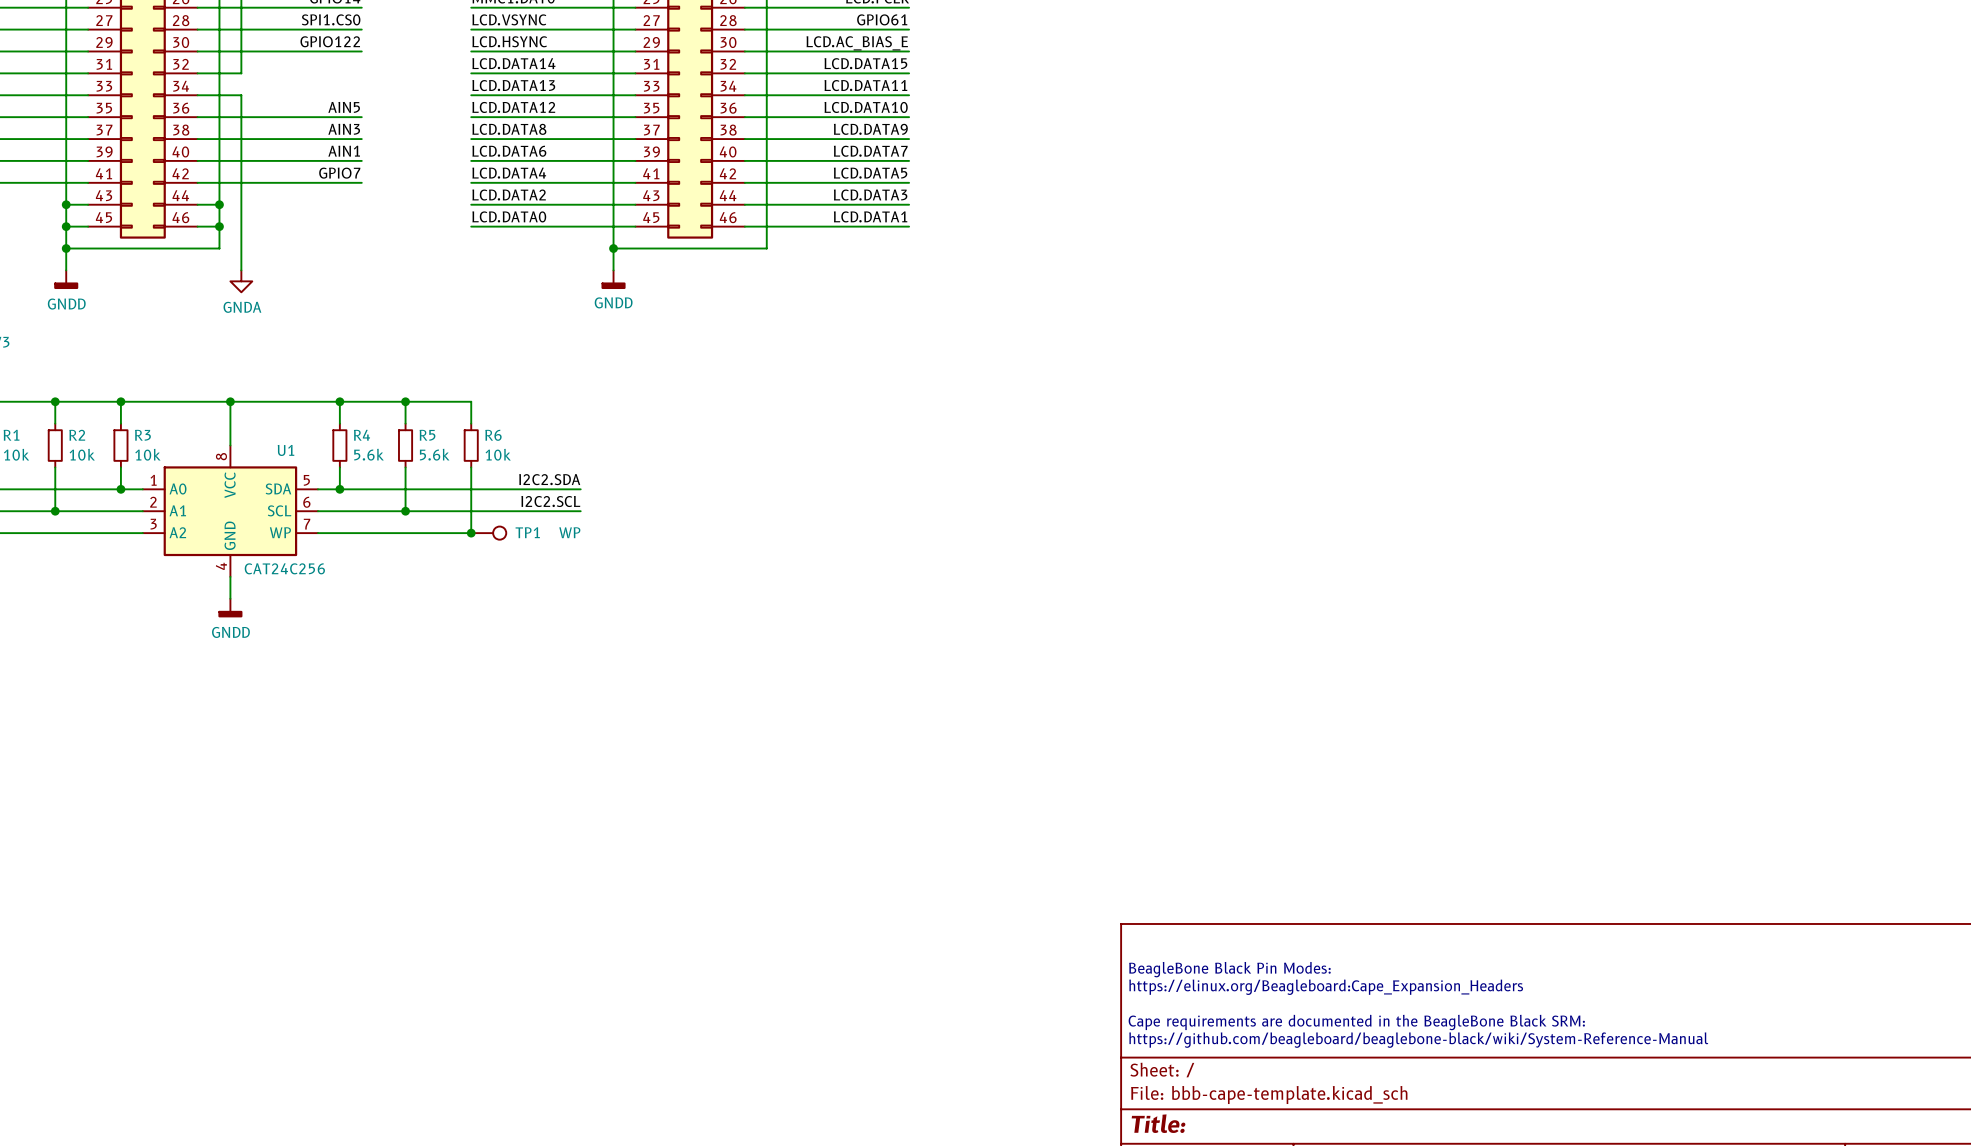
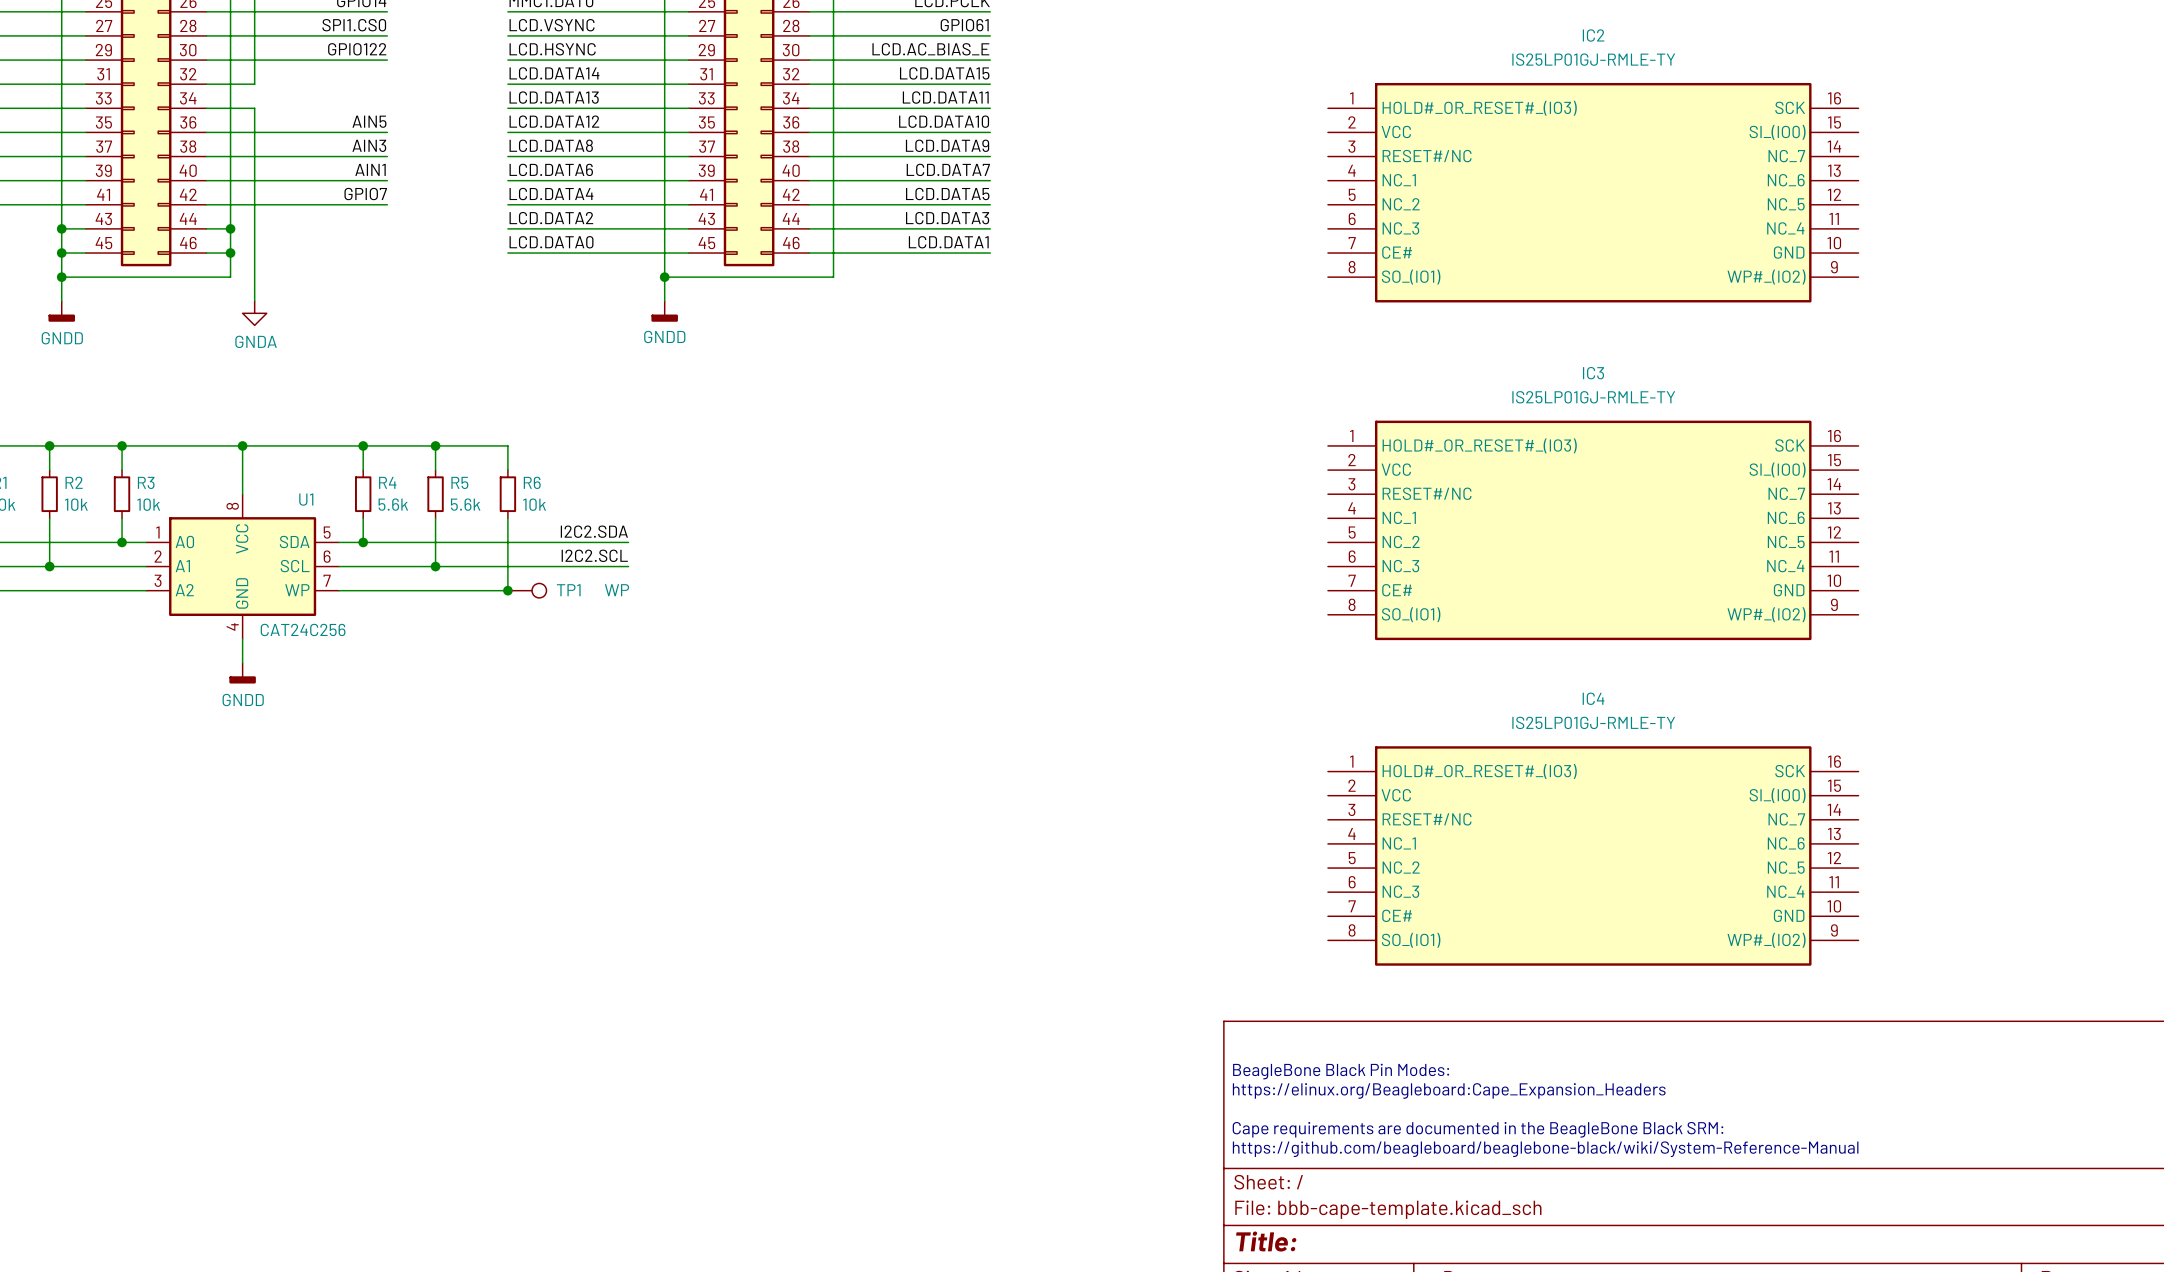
IC2: none -> IS25LP01GJ-RMLE-TY (1593, 192)
IC3: none -> IS25LP01GJ-RMLE-TY (1593, 530)
IC4: none -> IS25LP01GJ-RMLE-TY (1593, 855)

